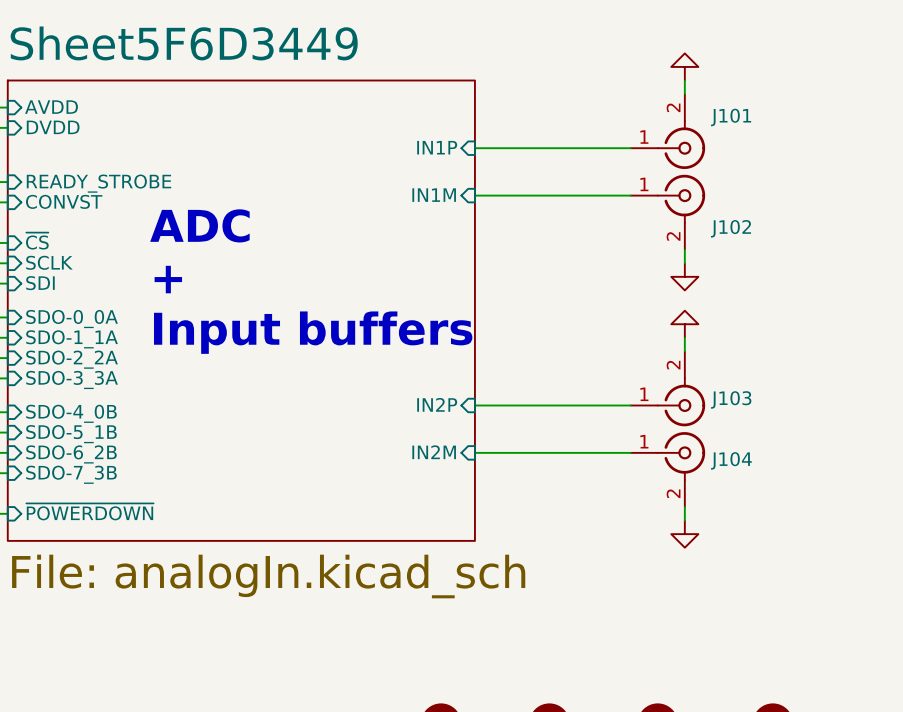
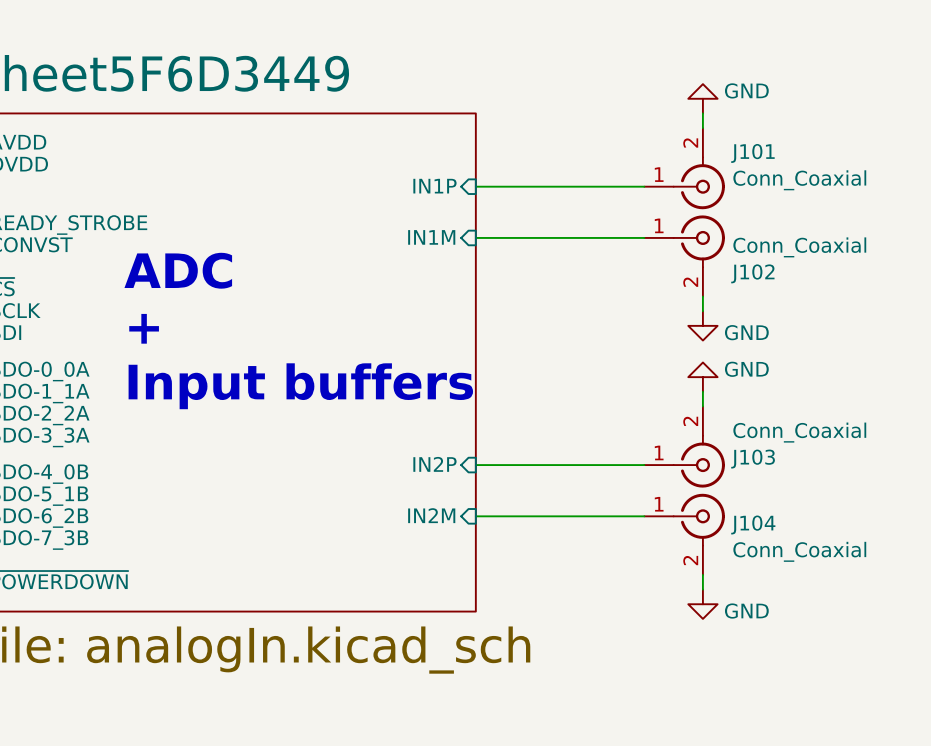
power symbol text: none -> GND (746, 90)
J101 value: none -> Conn_Coaxial (799, 180)
J102 value: none -> Conn_Coaxial (799, 247)
power symbol text: none -> GND (746, 332)
power symbol text: none -> GND (746, 369)
J103 value: none -> Conn_Coaxial (799, 432)
J104 value: none -> Conn_Coaxial (799, 551)
power symbol text: none -> GND (746, 611)

